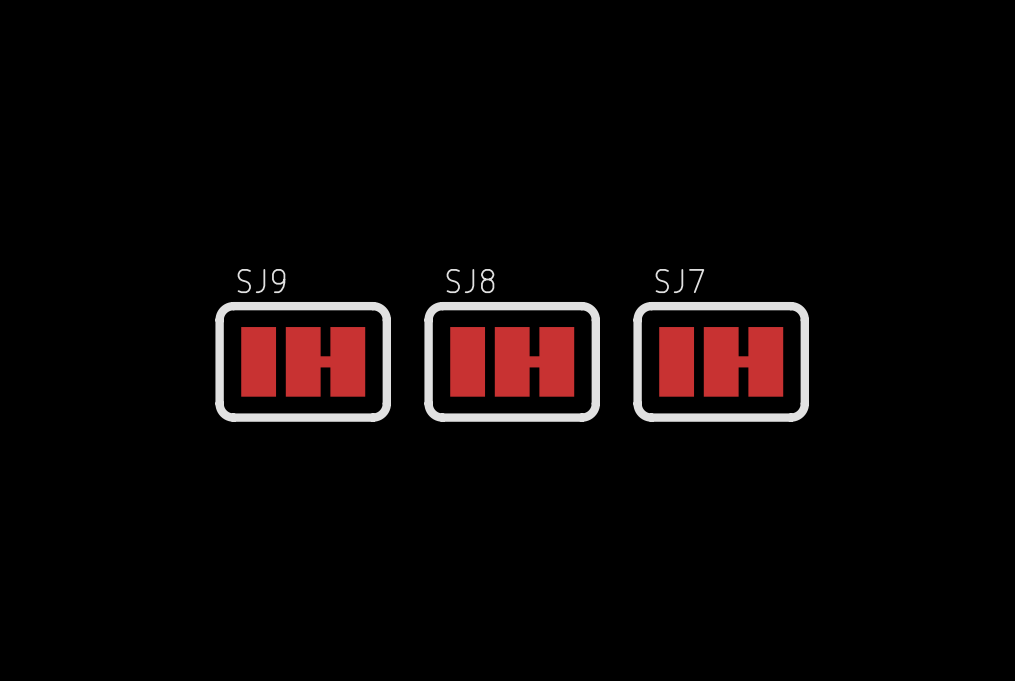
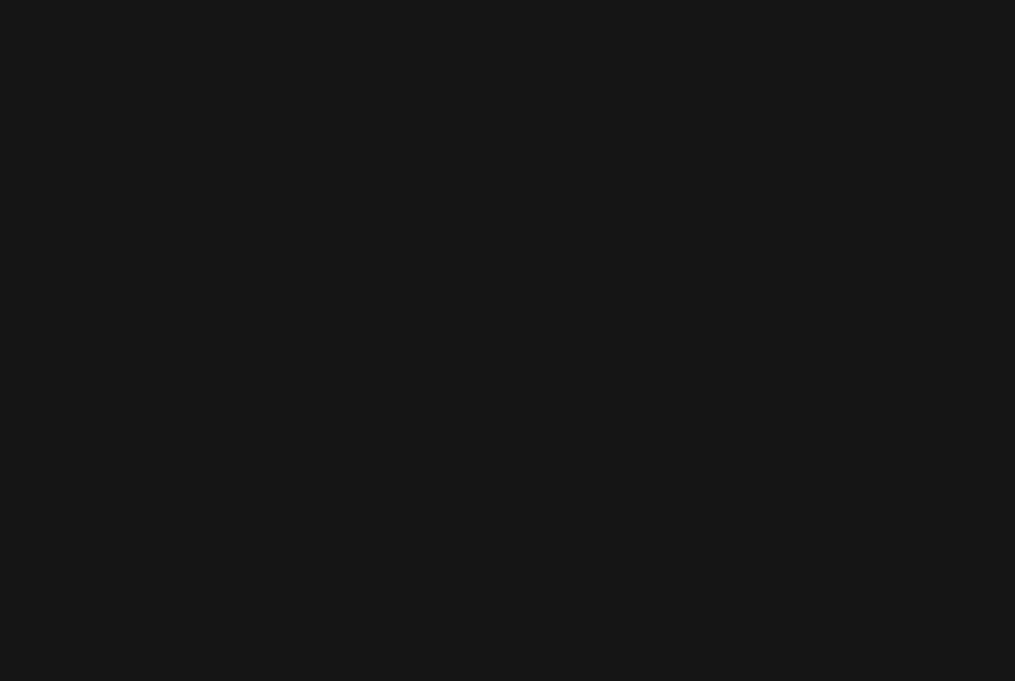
SJ9: (303, 361) -> none
SJ8: (512, 361) -> none
SJ7: (721, 361) -> none

